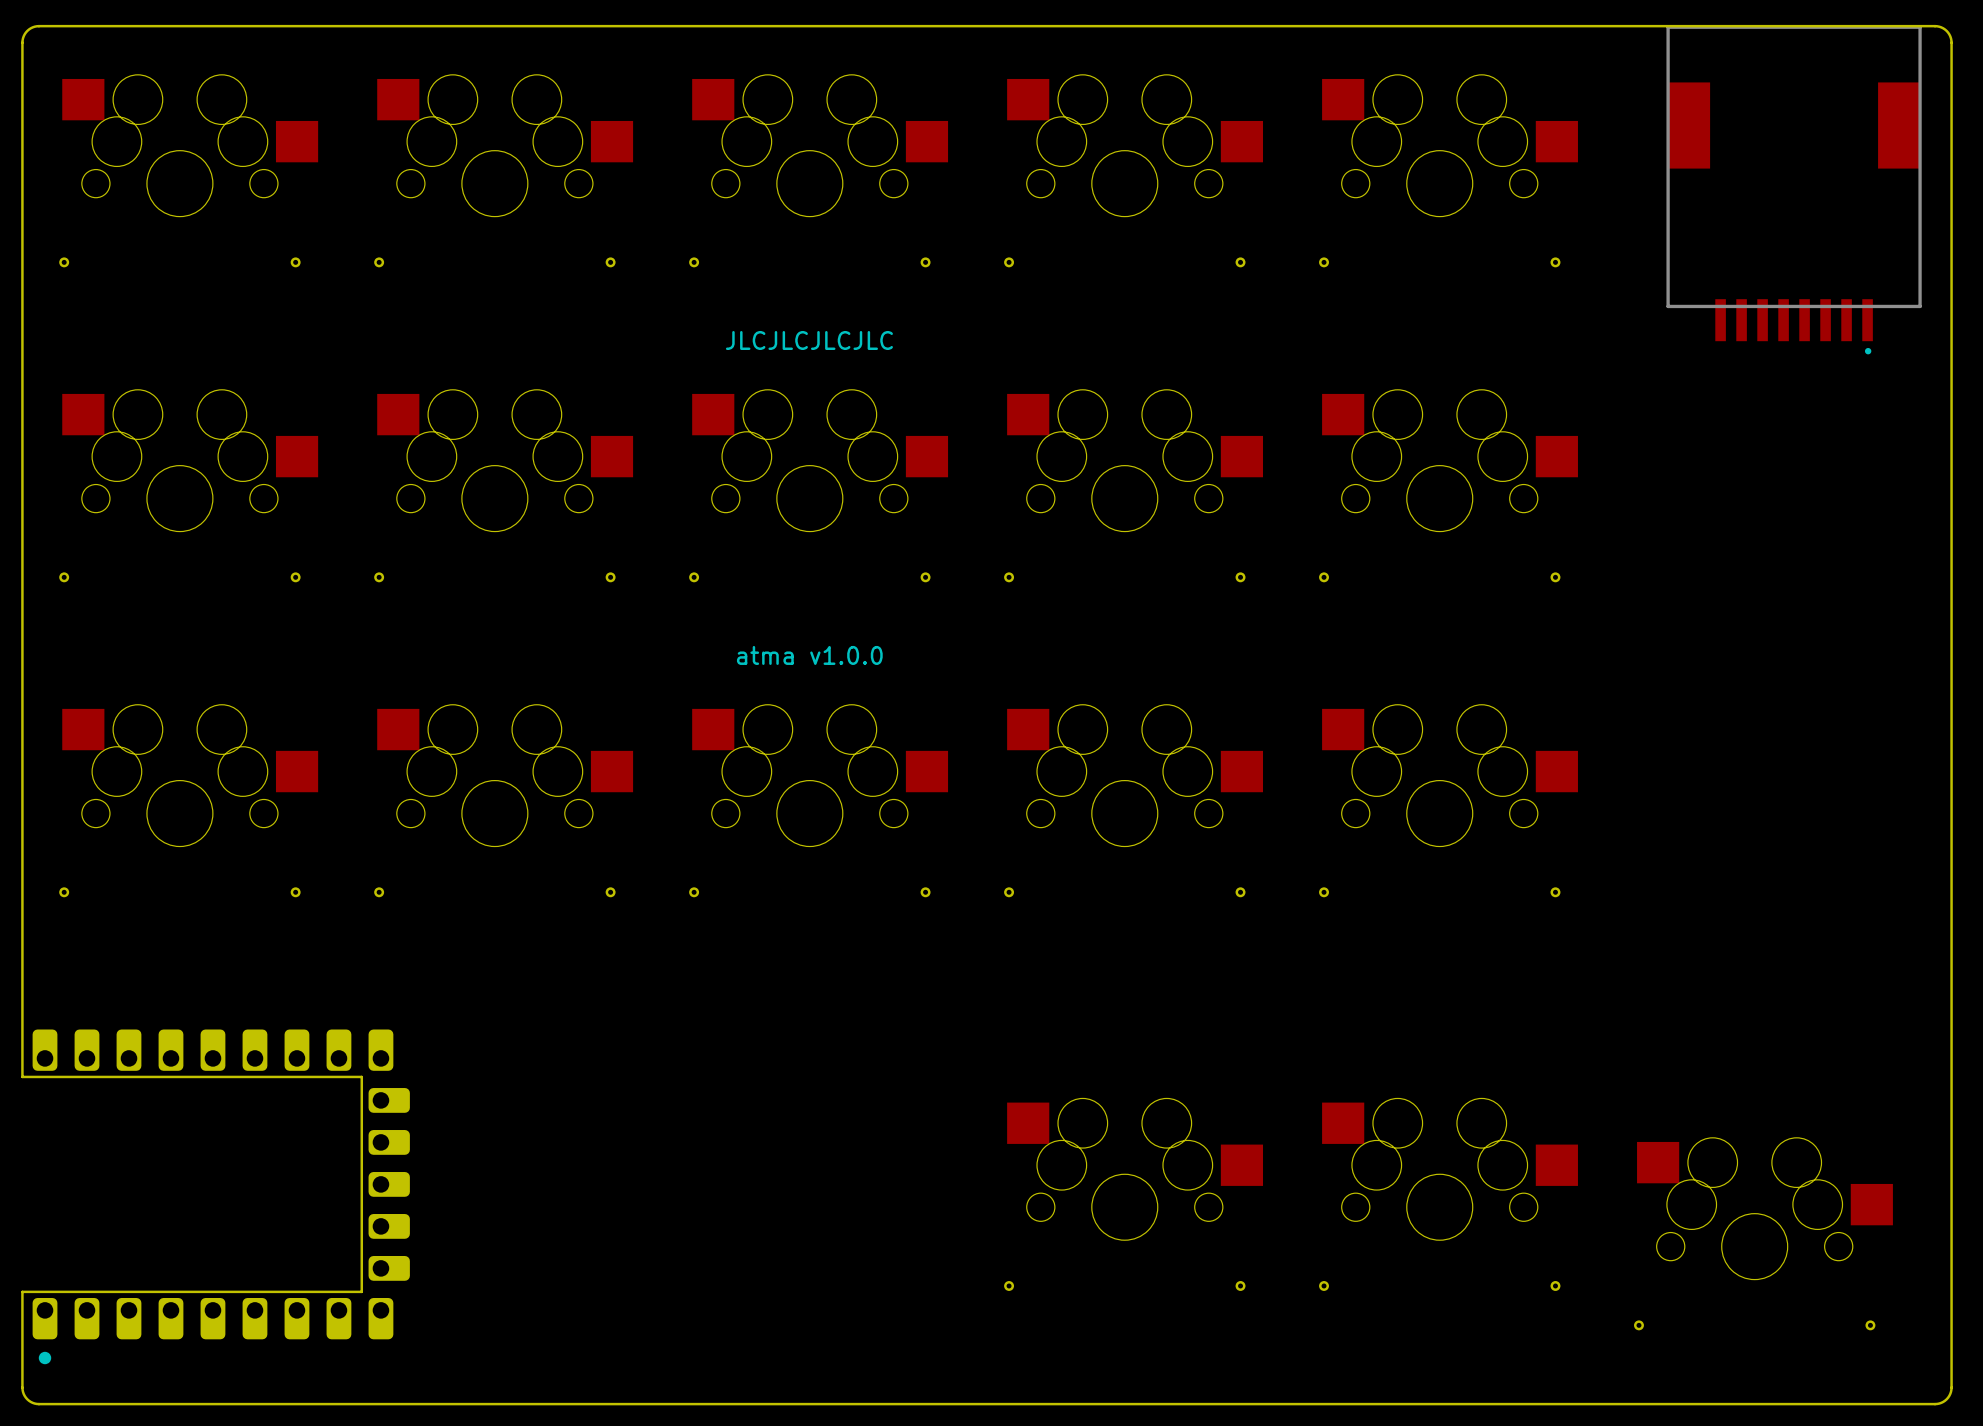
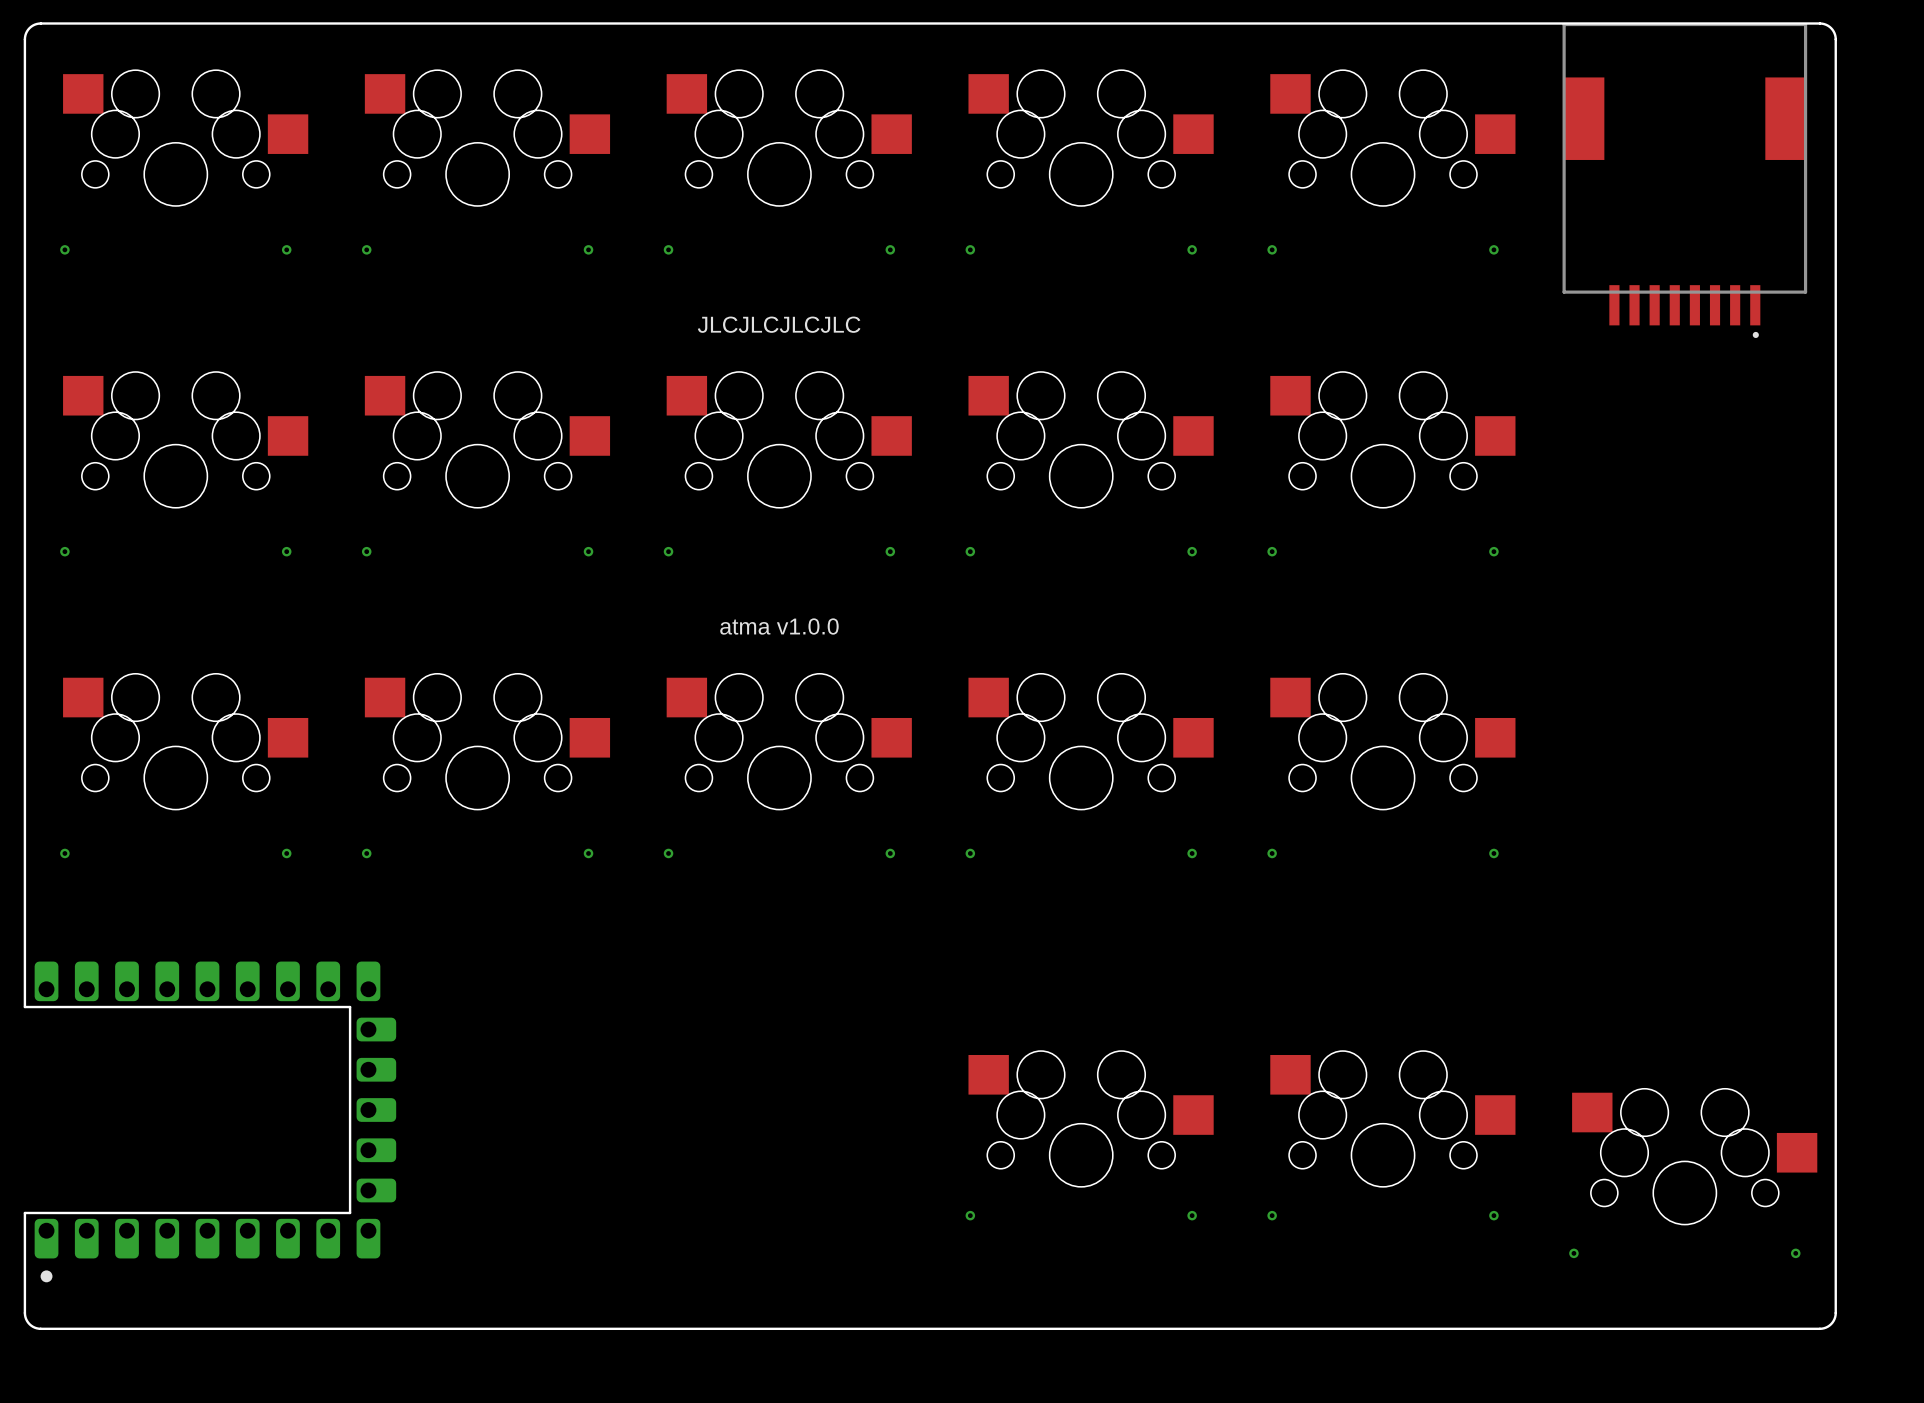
board edge: (1895, 26) (1939, 26) (1948, 32) (1951, 42) (1951, 1387) (1950, 1393) (1945, 1400) (1935, 1404) (38, 1404) (30, 1401) (24, 1395) (22, 1389) (22, 1371) -> (1819, 23) (1831, 28) (1835, 39) (1835, 1312) (1834, 1319) (1829, 1325) (1819, 1328) (40, 1328) (29, 1324) (24, 1312)
part position: (1794, 189) -> (1684, 180)
board edge: (22, 1052) (22, 1076) (361, 1076) -> (24, 1007) (350, 1007) (350, 1030)
part position: (221, 1196) -> (215, 1121)
board edge: (361, 1267) (361, 1291) (22, 1291) -> (350, 1212) (24, 1212) (24, 1236)
part position: (1009, 1285) -> (970, 1215)
part position: (1240, 1285) -> (1192, 1215)
part position: (1324, 1285) -> (1272, 1215)
part position: (1555, 1285) -> (1493, 1215)
part position: (1638, 1325) -> (1573, 1253)
part position: (1870, 1325) -> (1795, 1253)

